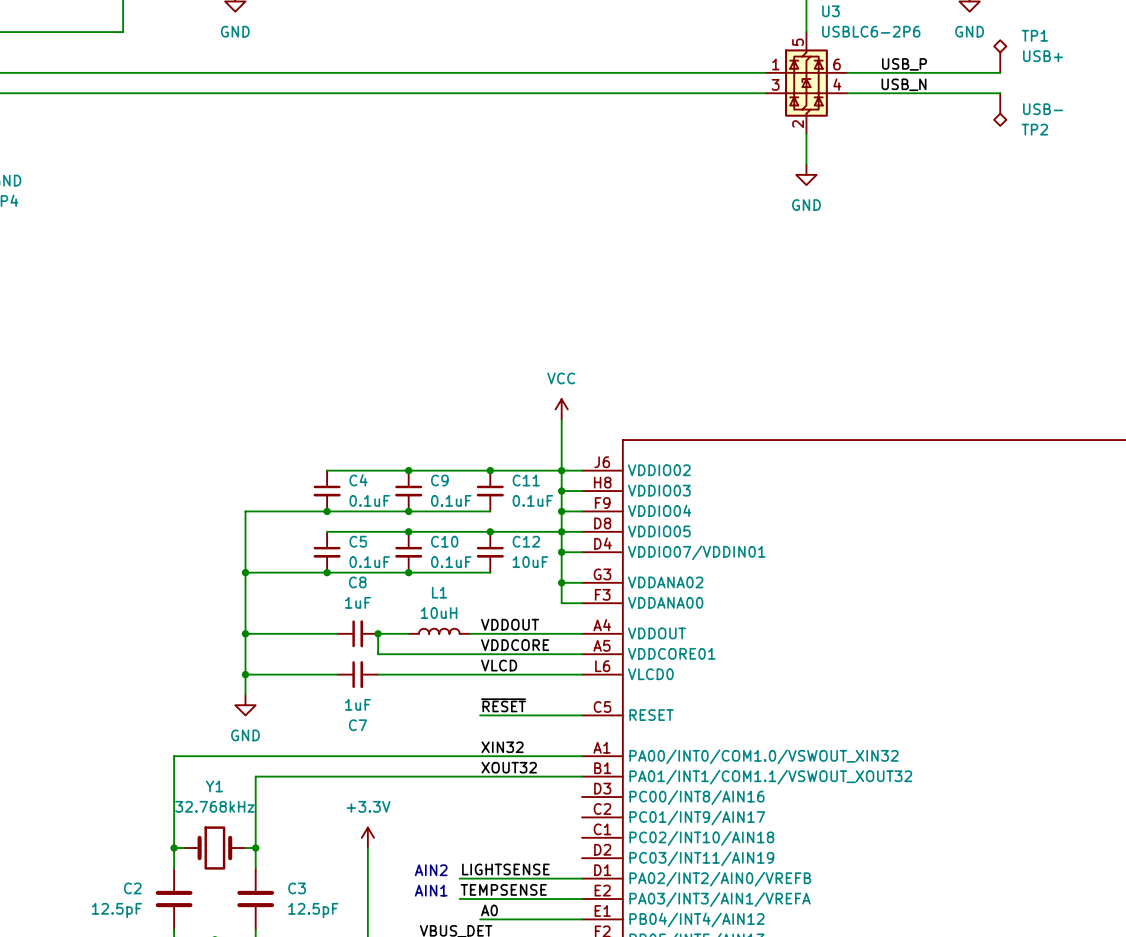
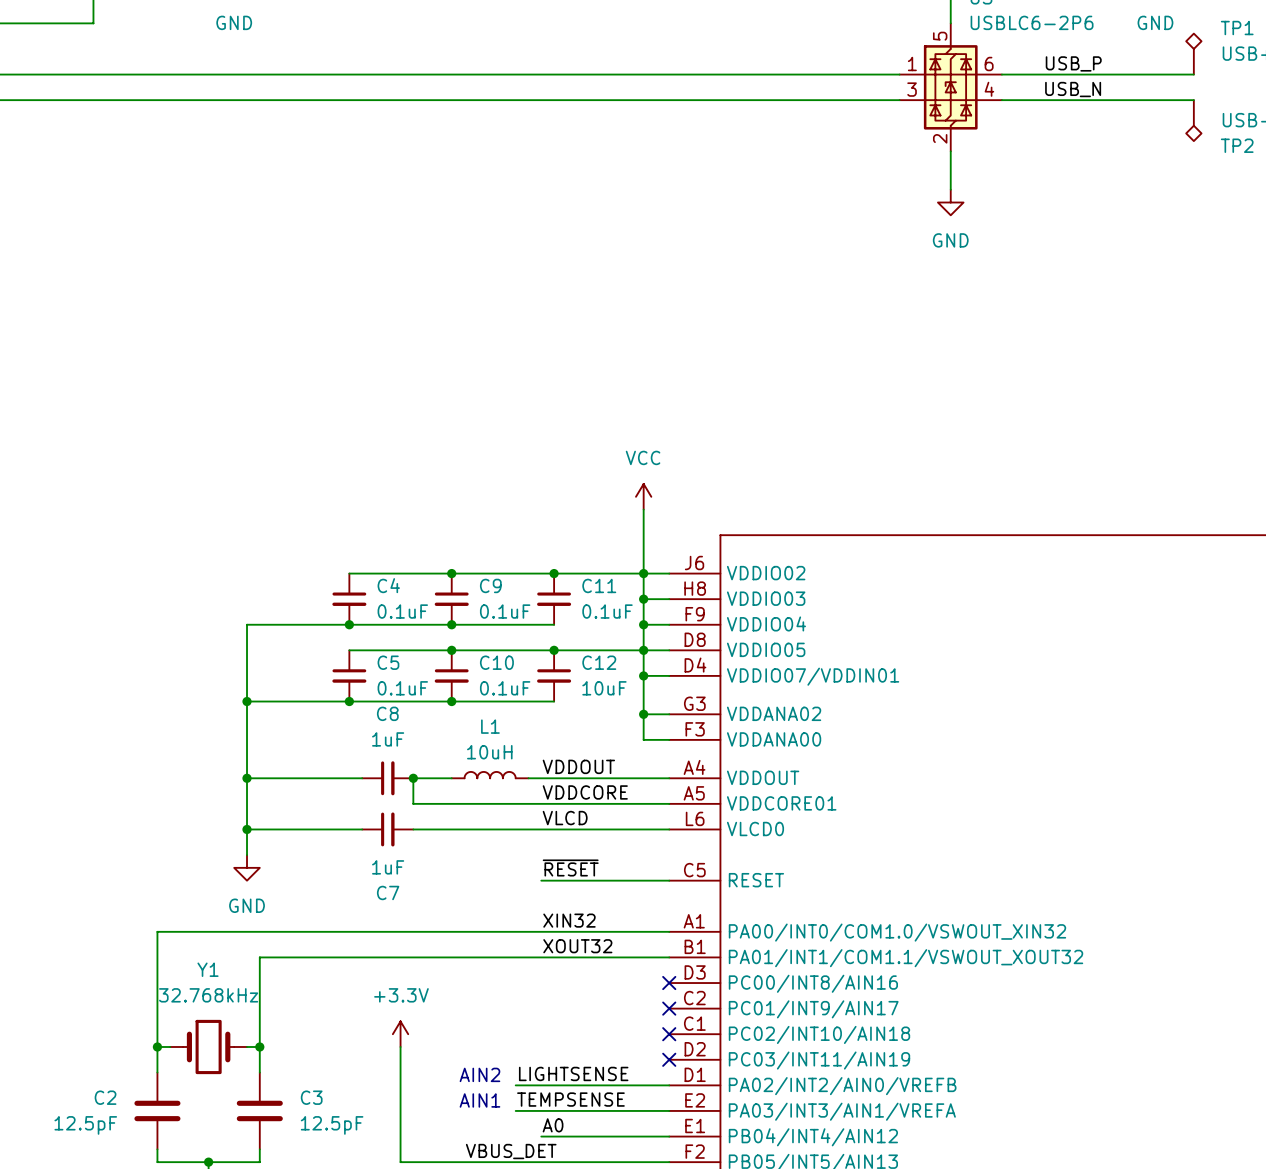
no-connect mark: none -> (669, 983)
no-connect mark: none -> (669, 1008)
no-connect mark: none -> (669, 1034)
no-connect mark: none -> (669, 1059)

